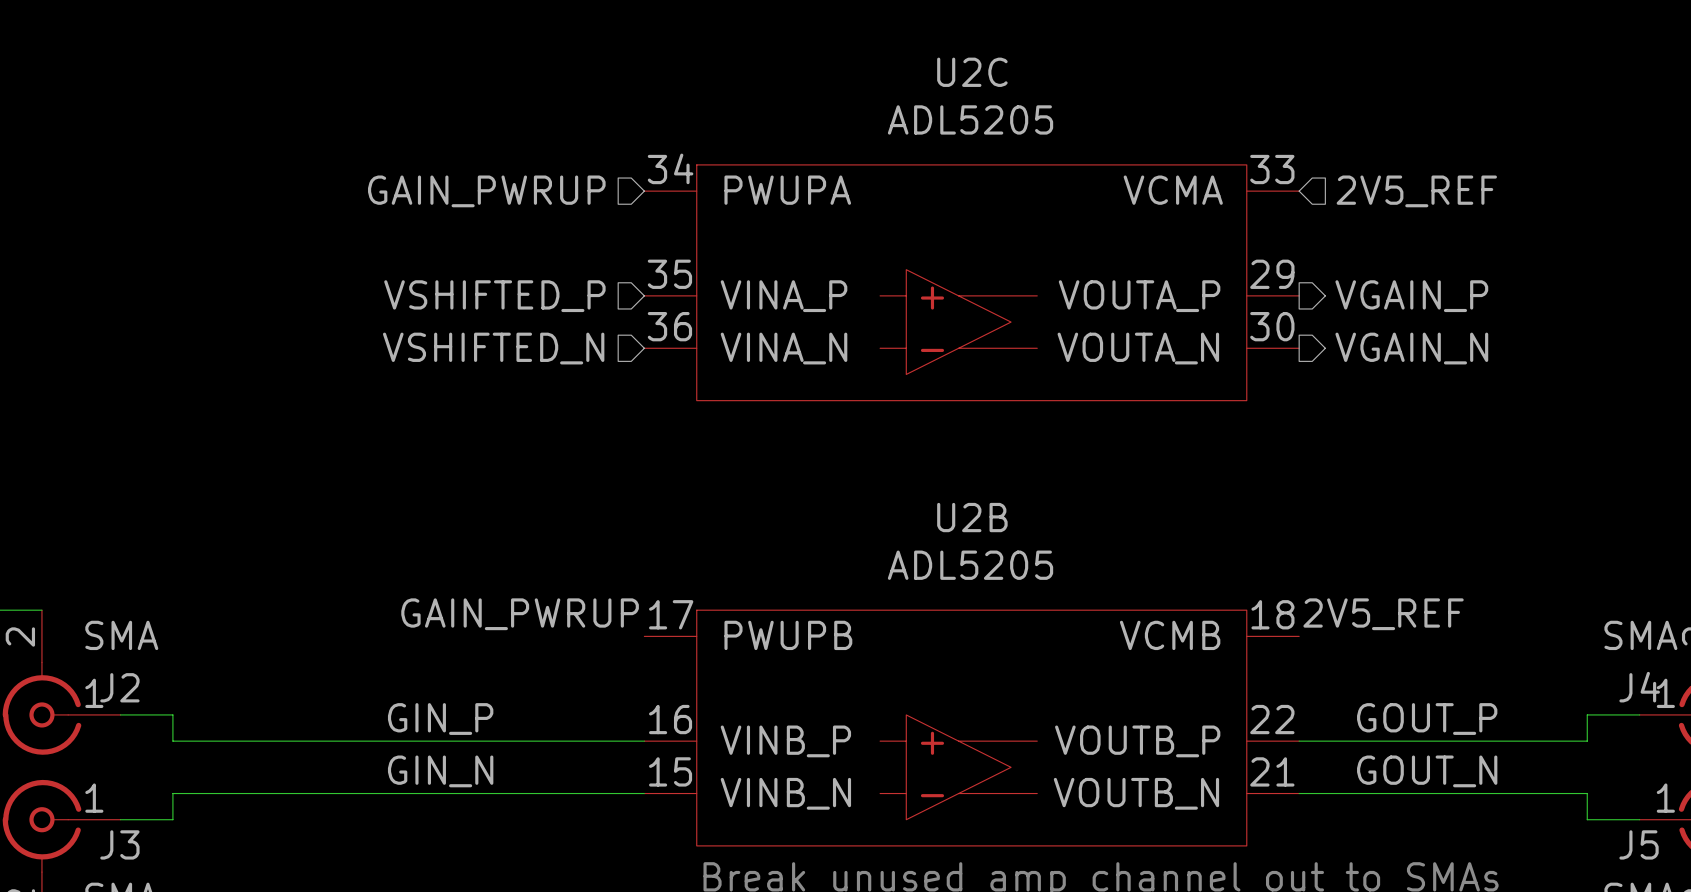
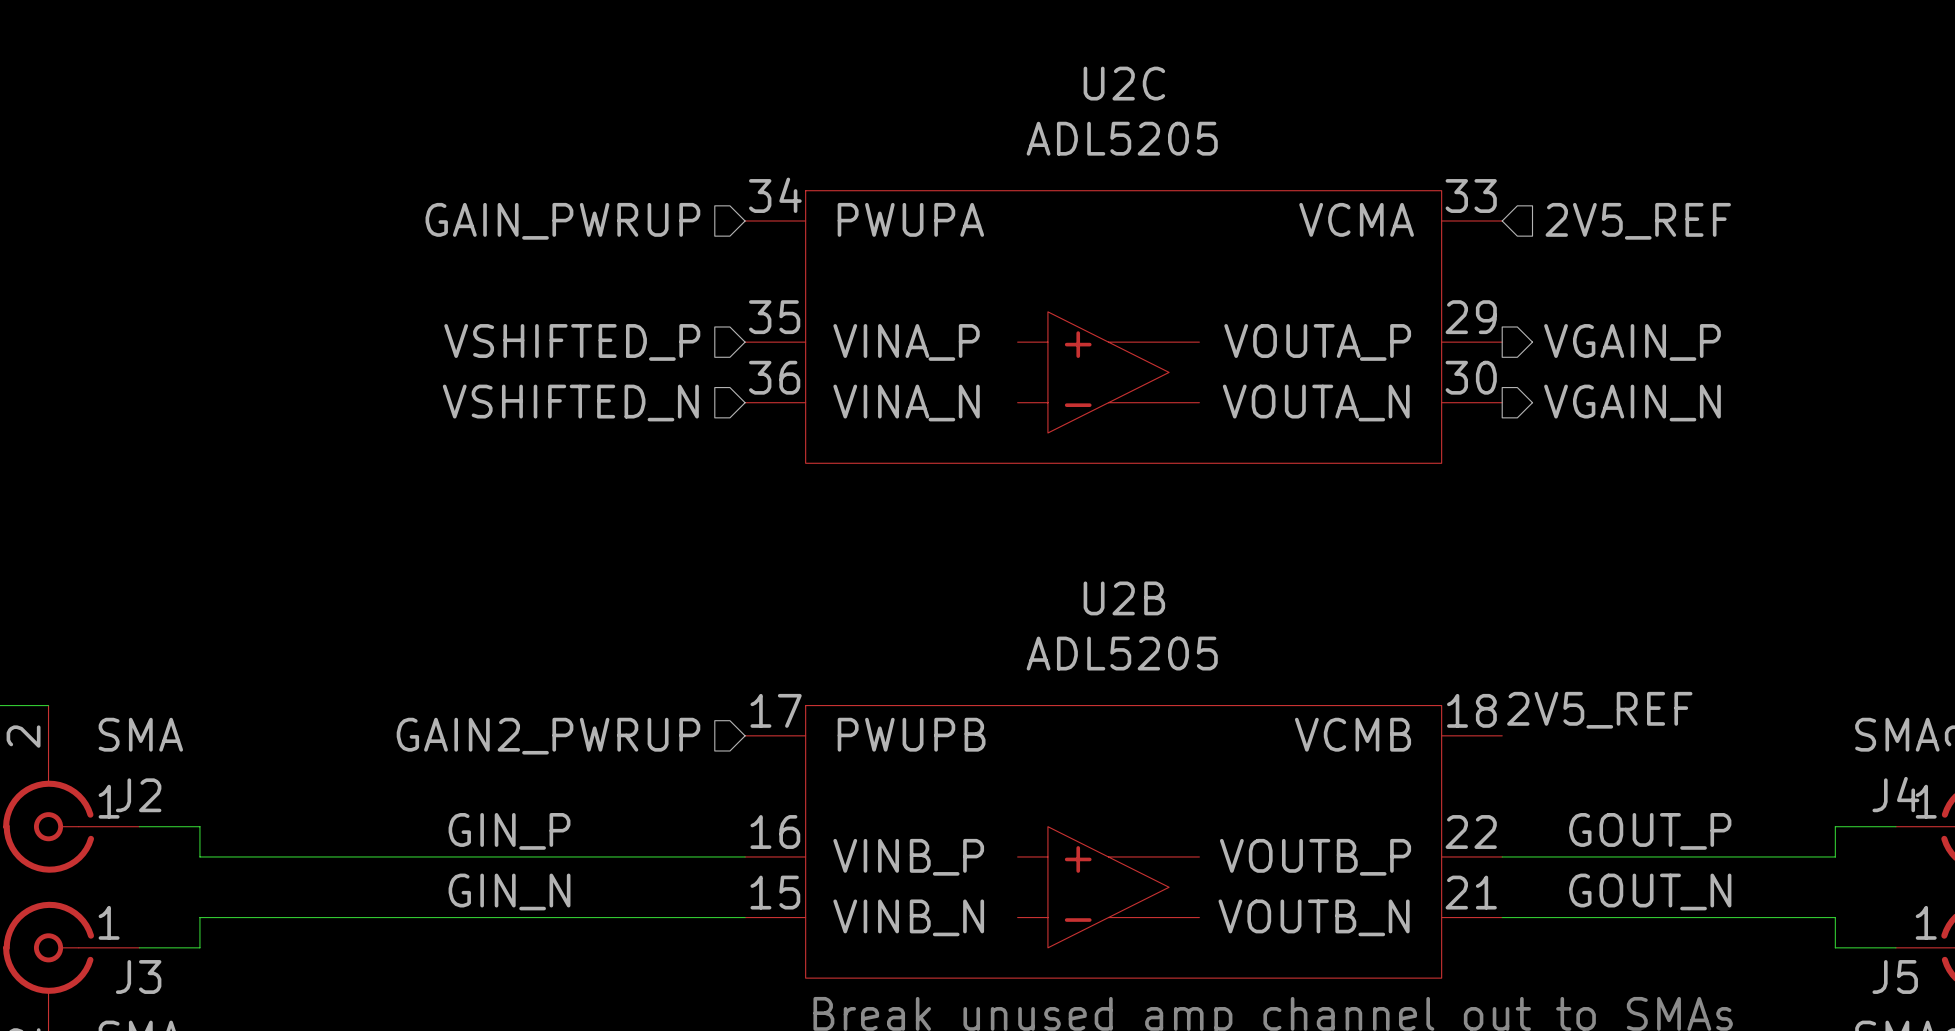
label: GAIN_PWRUP (520, 614) -> none
hierarchical label: none -> GAIN2_PWRUP (548, 736)

